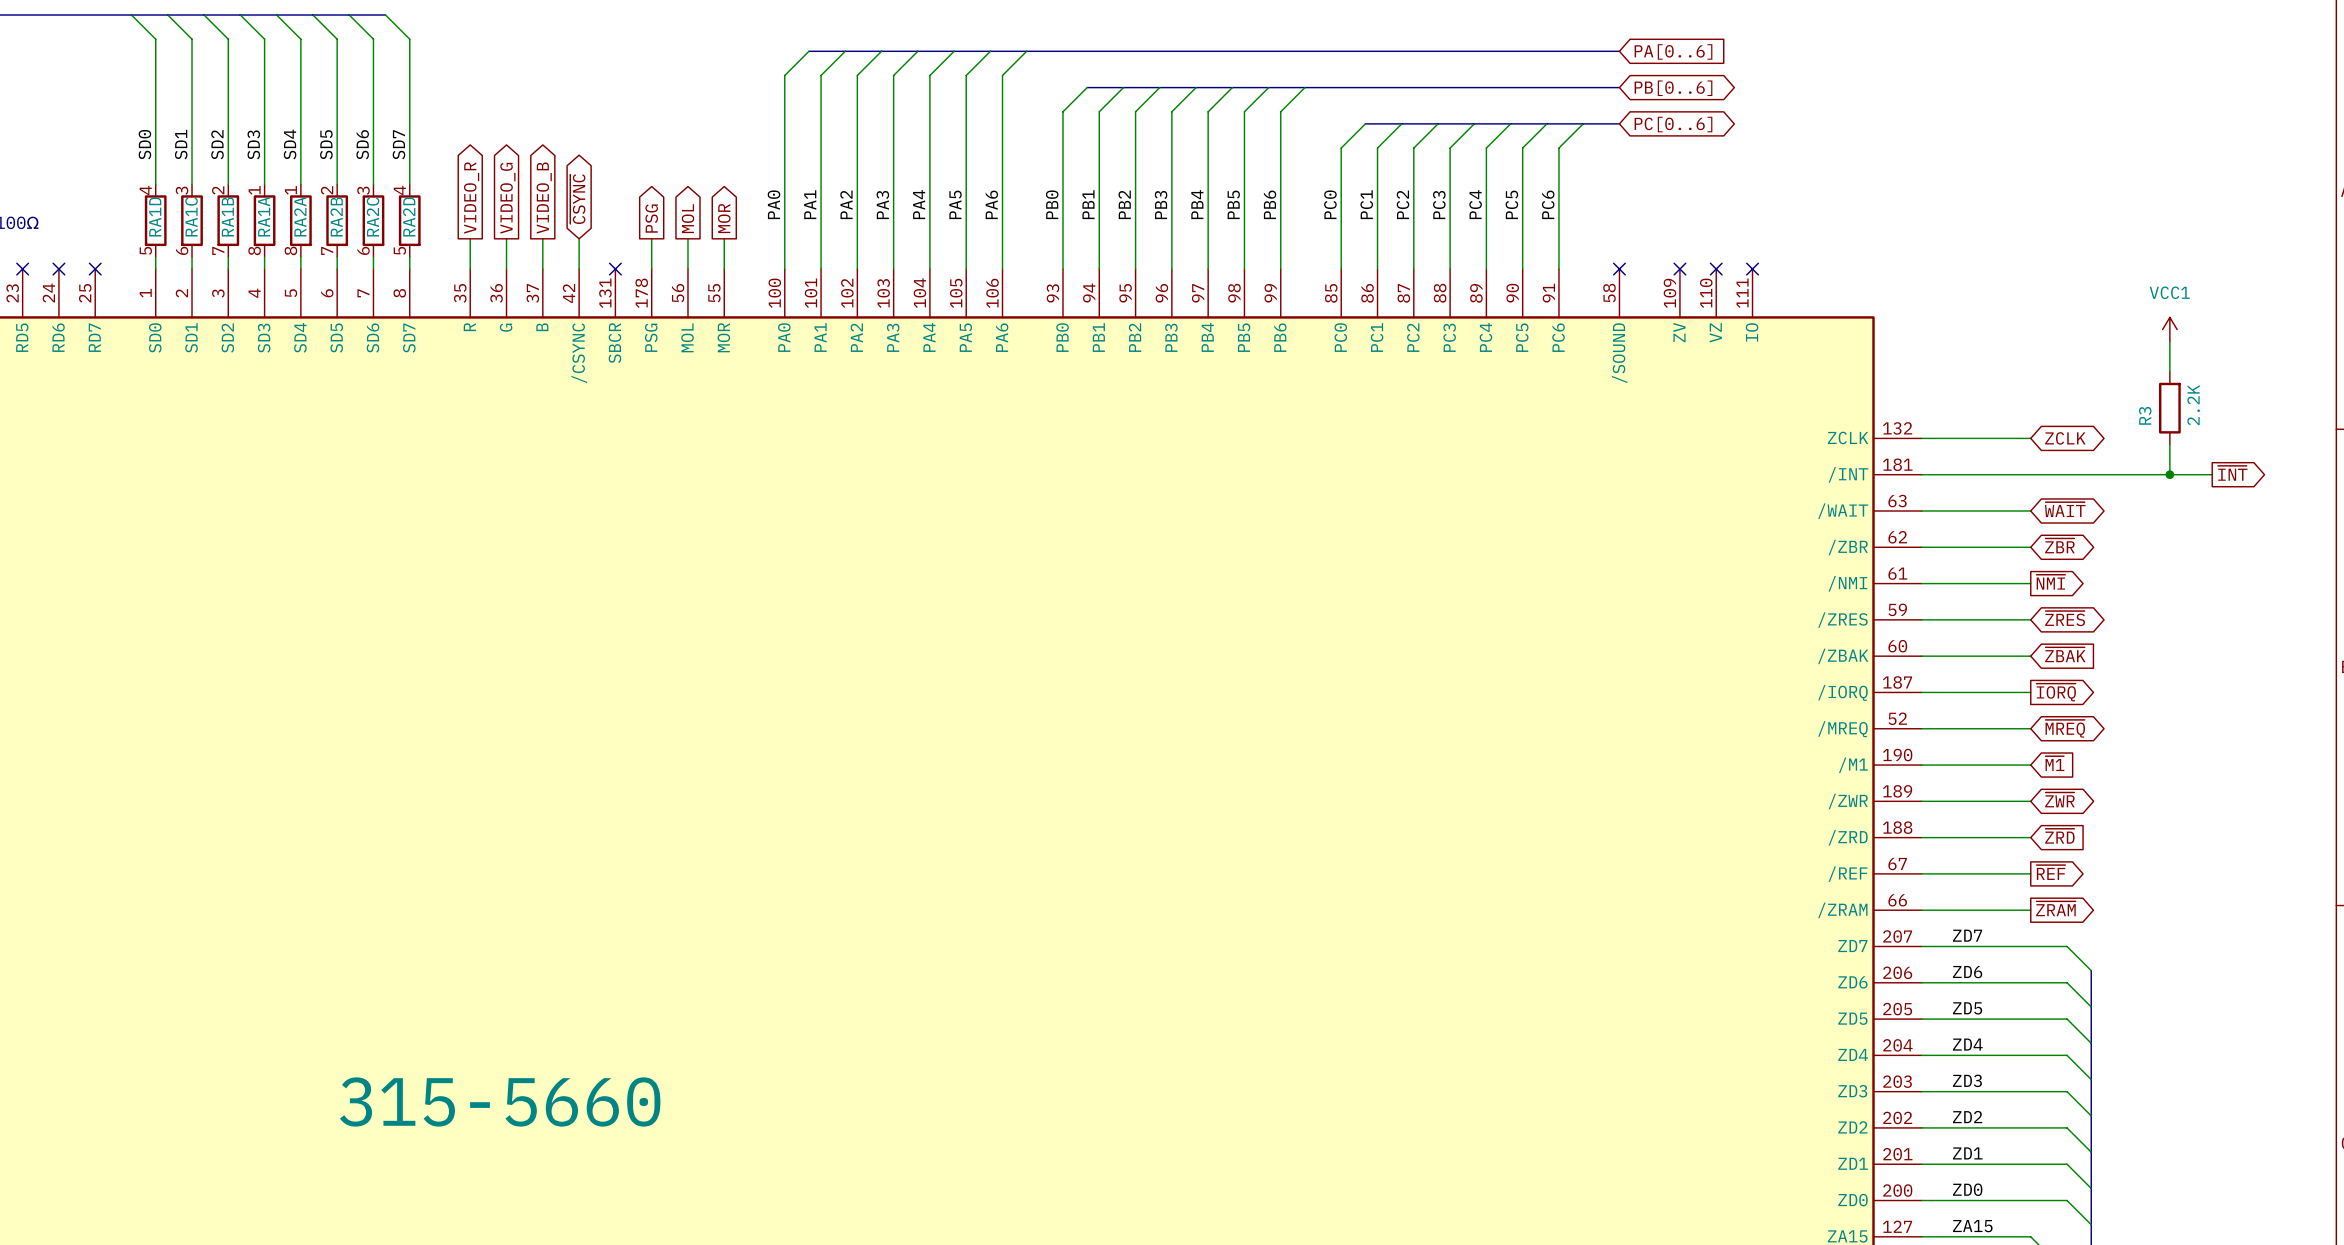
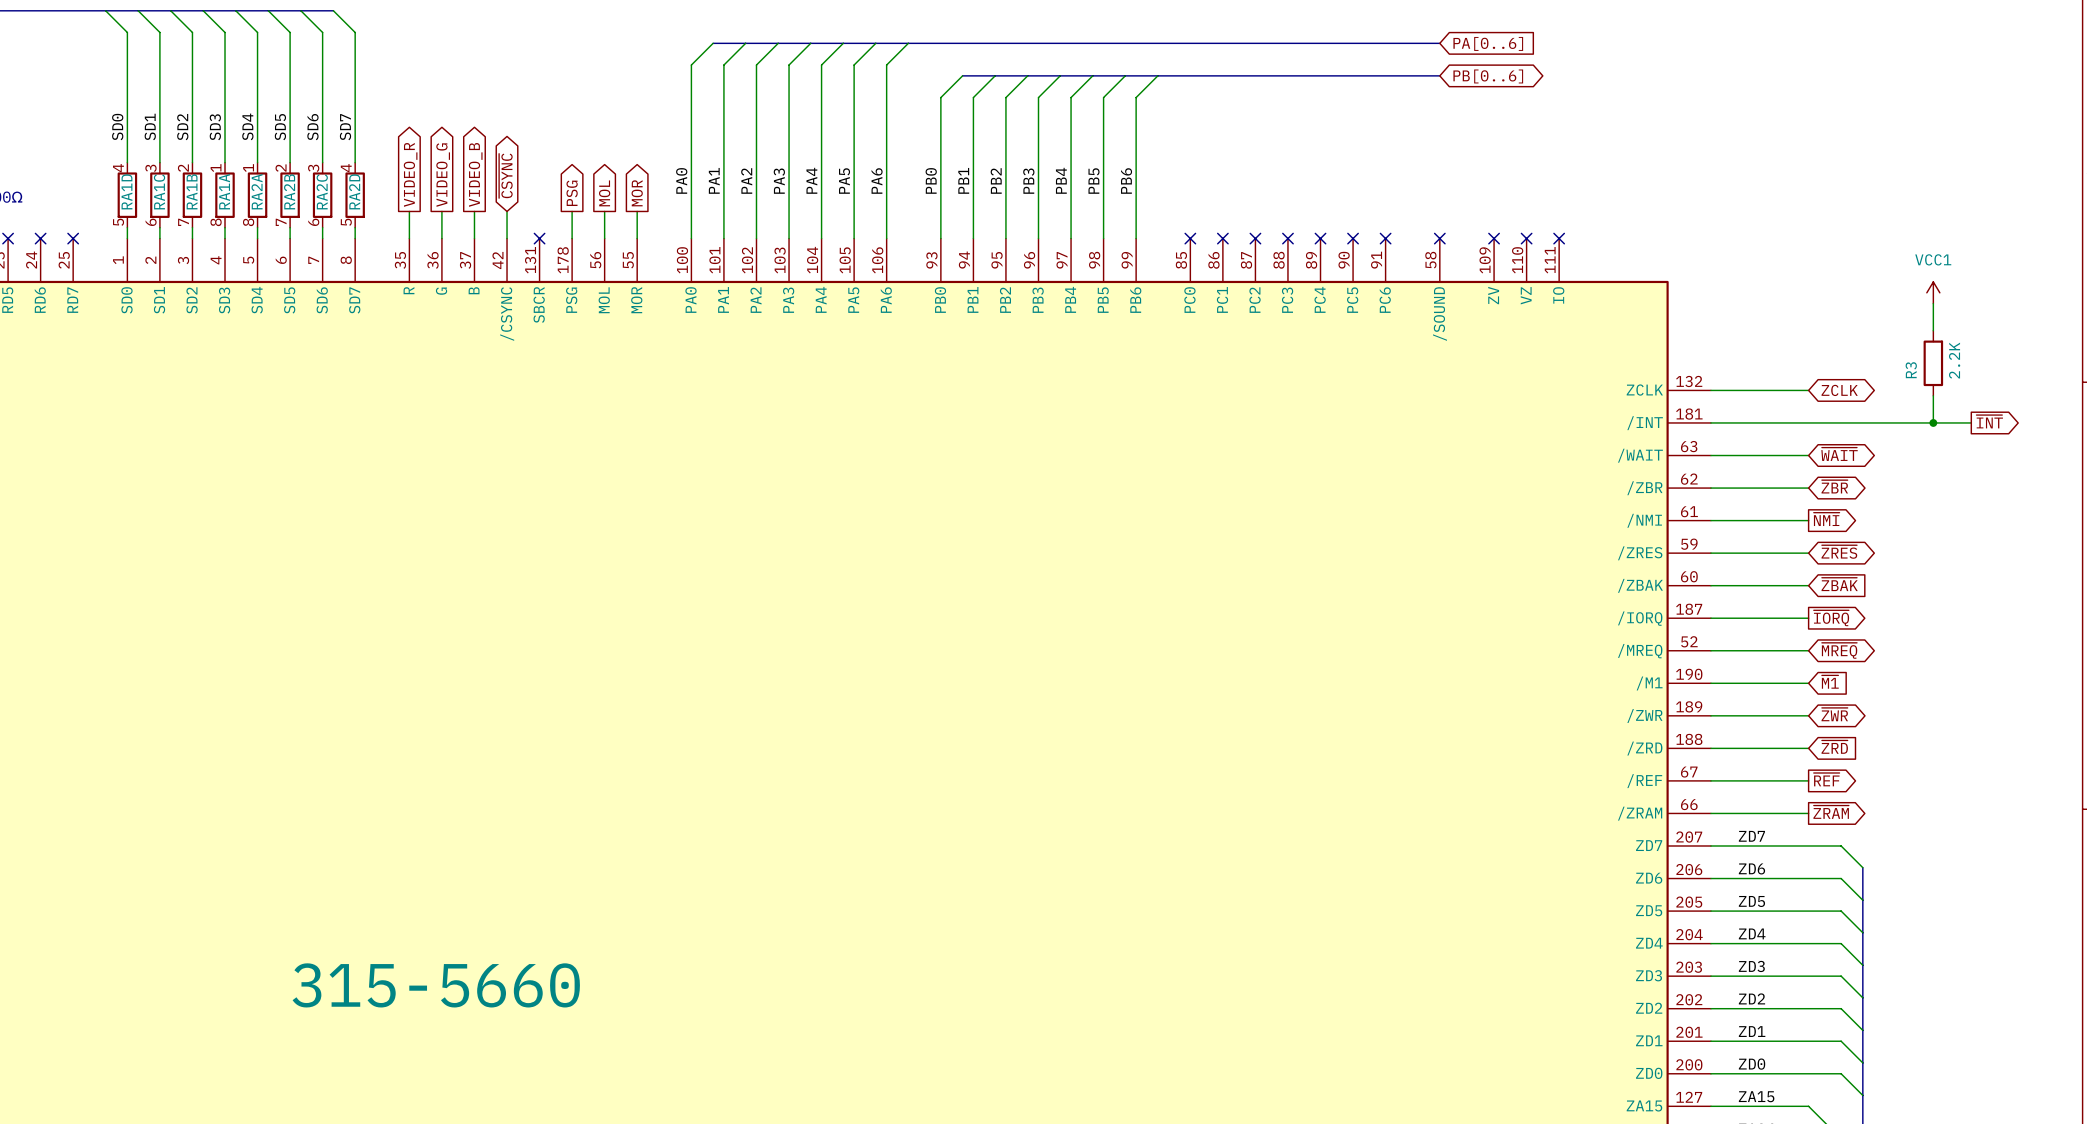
wire: (1365, 123) (1341, 148) (1341, 269) -> none
bus: (1365, 123) (1619, 123) -> none
wire: (1401, 123) (1377, 148) (1377, 269) -> none
wire: (1438, 123) (1413, 148) (1413, 269) -> none
wire: (1474, 123) (1450, 148) (1450, 269) -> none
wire: (1510, 123) (1486, 148) (1486, 269) -> none
wire: (1546, 123) (1522, 148) (1522, 269) -> none
wire: (1583, 123) (1558, 148) (1558, 269) -> none
global label: PC[0..6] (1673, 124) -> none
label: PC0 (1330, 204) -> none
label: PC1 (1366, 204) -> none
label: PC2 (1403, 204) -> none
label: PC4 (1475, 204) -> none
label: PC5 (1511, 204) -> none
label: PC6 (1548, 204) -> none
label: PC3 (1439, 205) -> none
no-connect mark: none -> (1190, 238)
no-connect mark: none -> (1222, 238)
no-connect mark: none -> (1255, 238)
no-connect mark: none -> (1287, 238)
no-connect mark: none -> (1320, 238)
no-connect mark: none -> (1353, 238)
no-connect mark: none -> (1385, 238)

